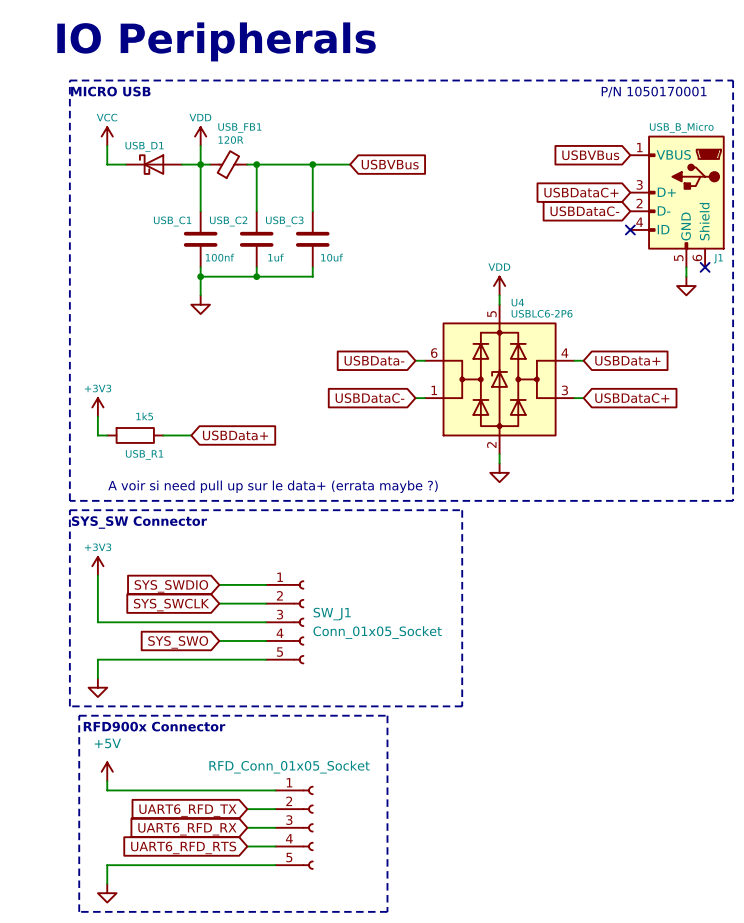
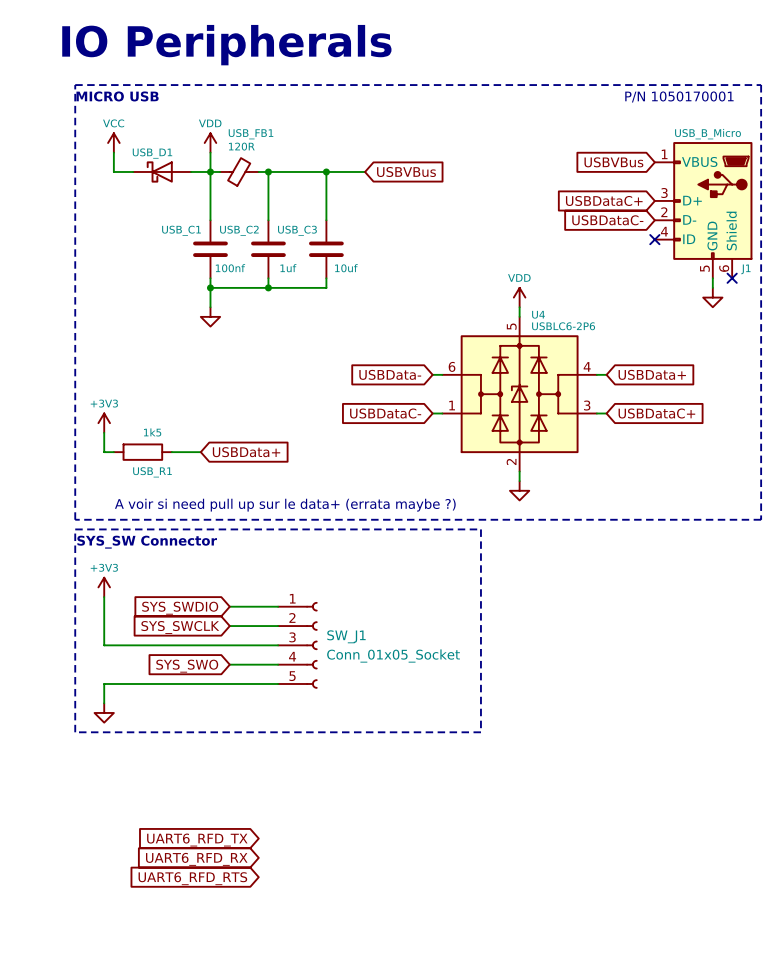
line: (79, 715) (387, 715) (387, 911) (79, 911) (79, 715) -> none
text: RFD900x Connector (154, 726) -> none
power symbol: +5V (107, 771) -> none
wire: (107, 781) (107, 790) (275, 790) -> none
wire: (247, 809) (275, 809) -> none
wire: (247, 827) (275, 827) -> none
part: RFD_Conn_01x05_Socket (294, 827) -> none
wire: (247, 846) (275, 846) -> none
wire: (275, 865) (107, 865) (107, 883) -> none
power symbol: (107, 893) -> none

